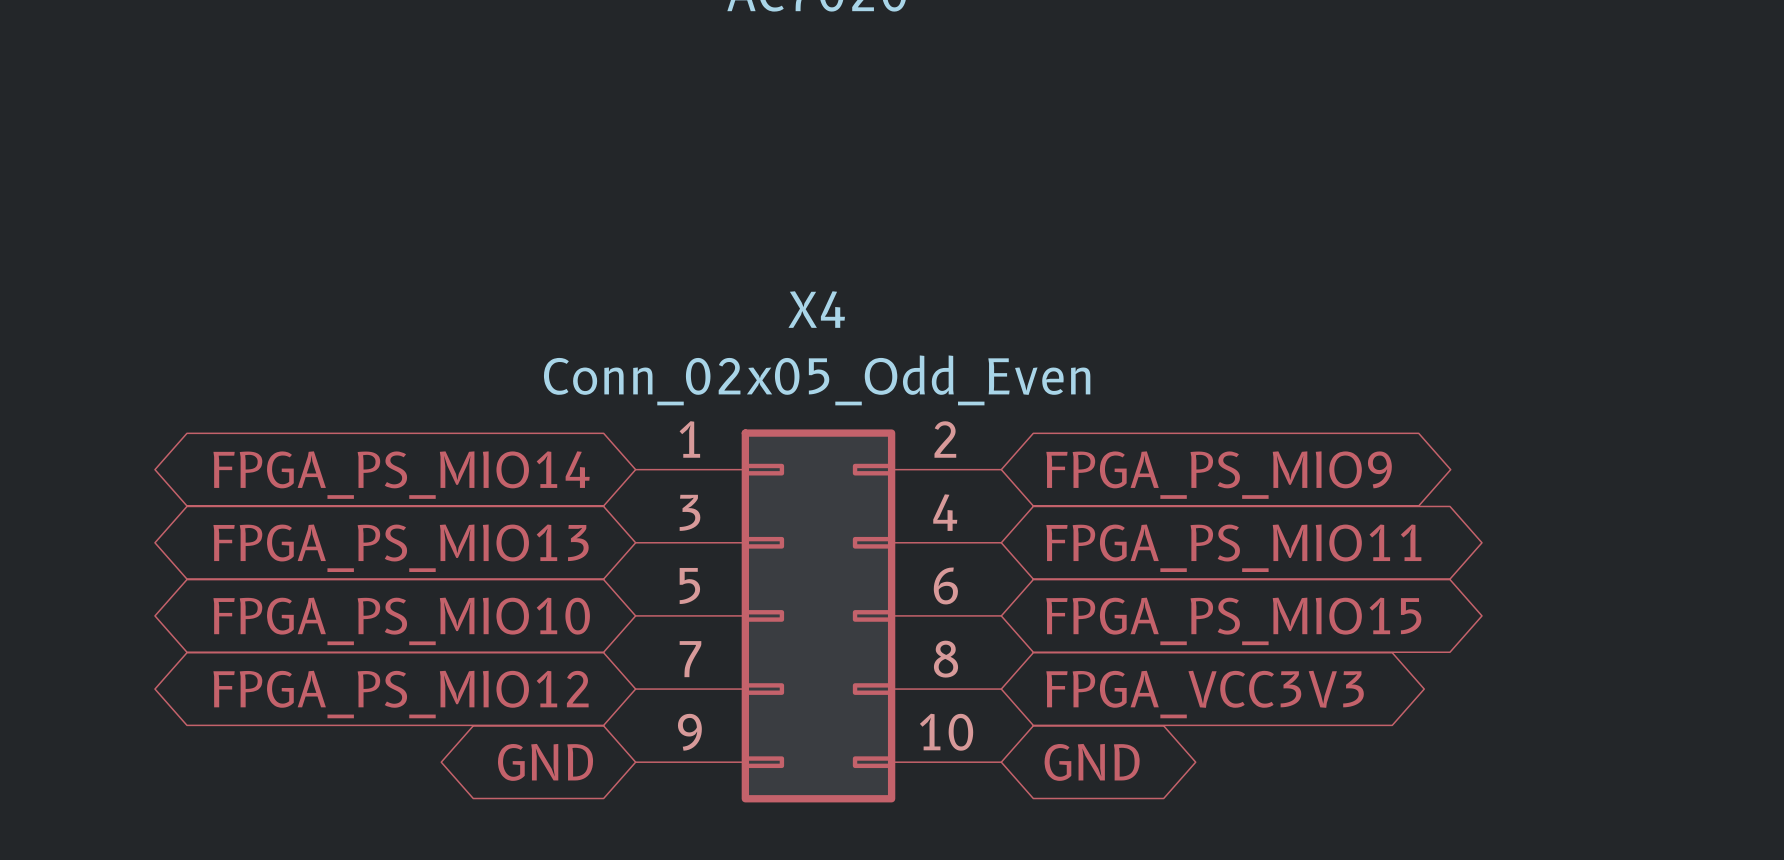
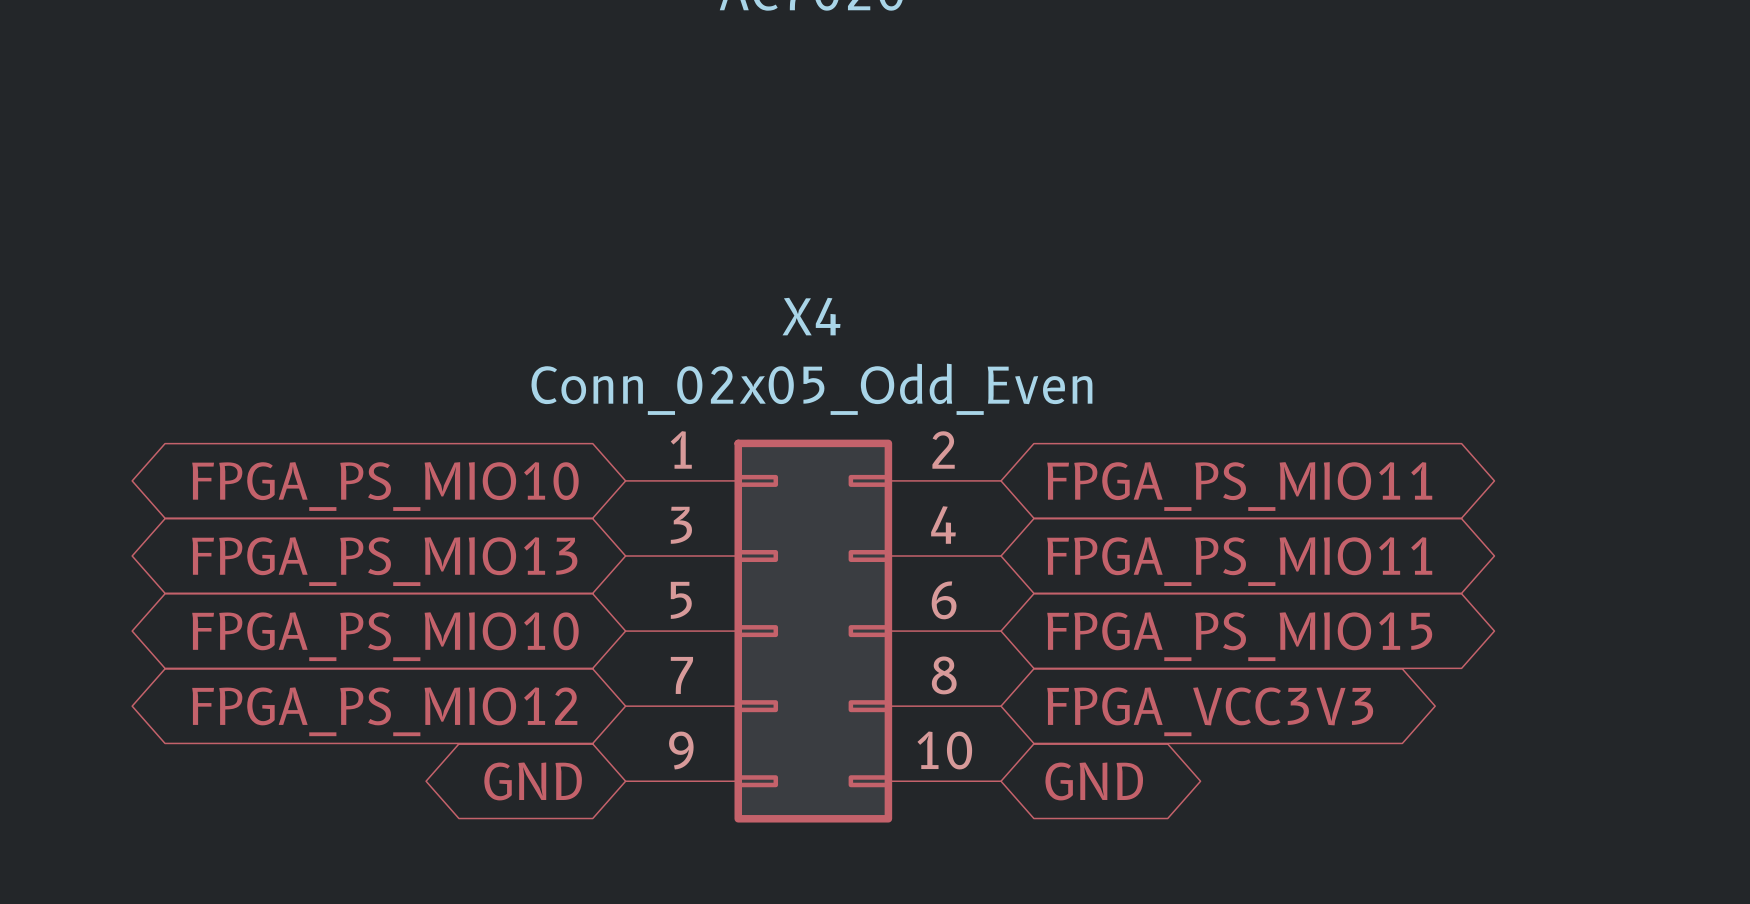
global label: FPGA_PS_MIO14 (401, 475) -> FPGA_PS_MIO10 (385, 486)
global label: FPGA_PS_MIO9 (1219, 475) -> FPGA_PS_MIO11 (1239, 486)

